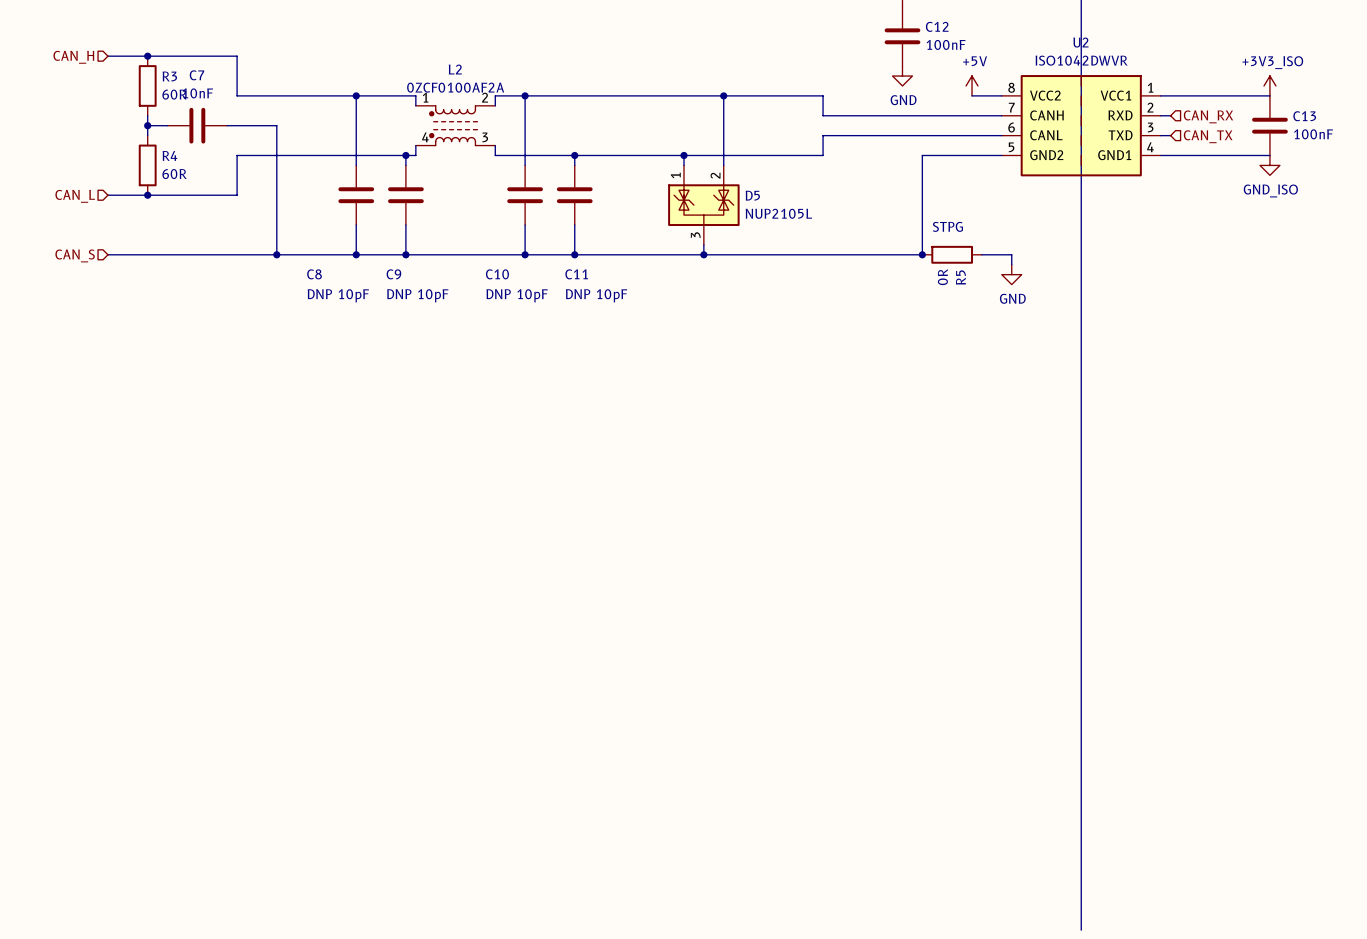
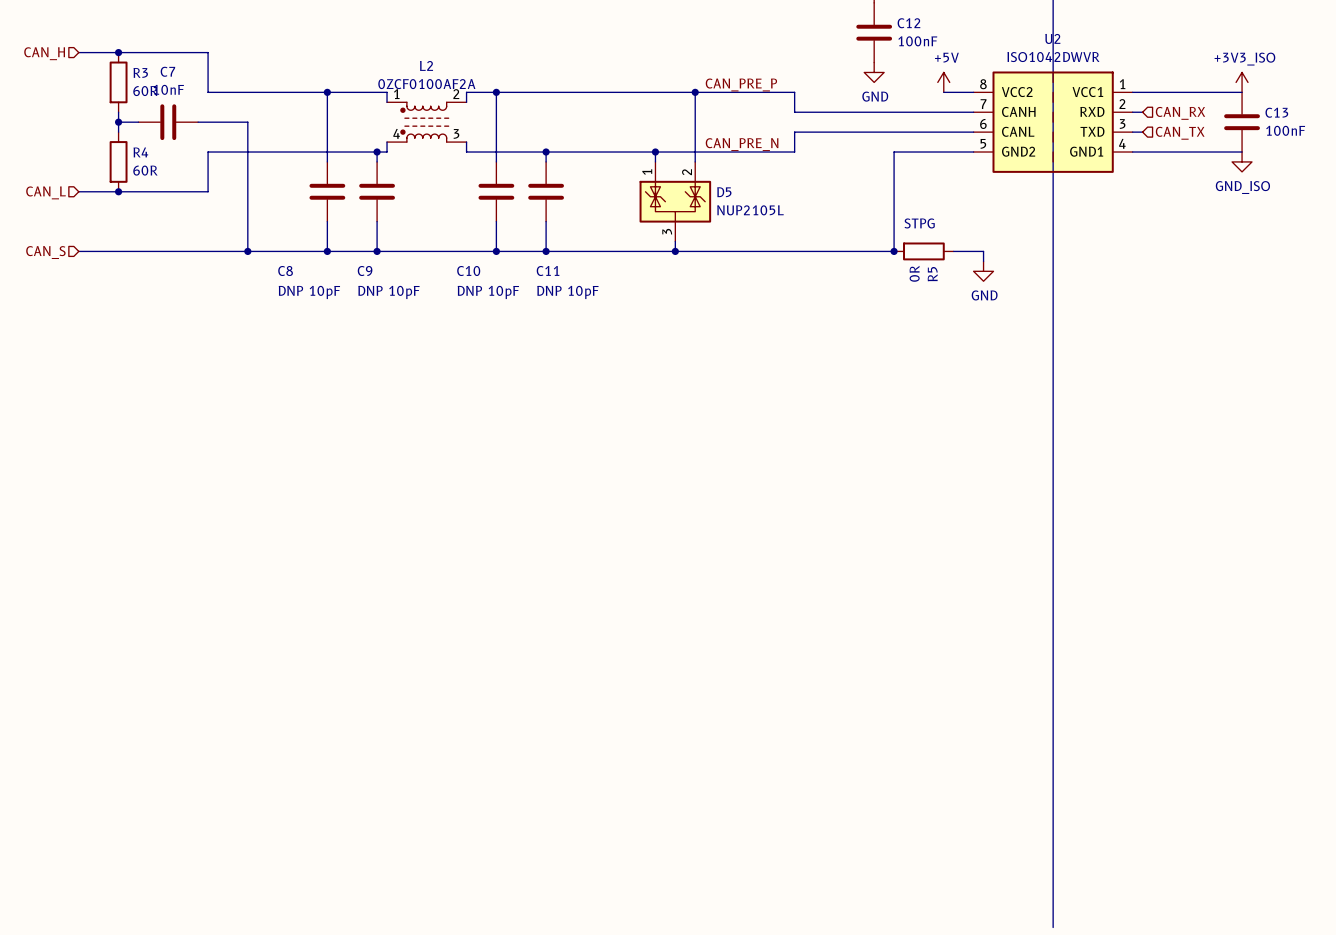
label: none -> CAN_PRE_P (741, 84)
label: none -> CAN_PRE_N (742, 144)

